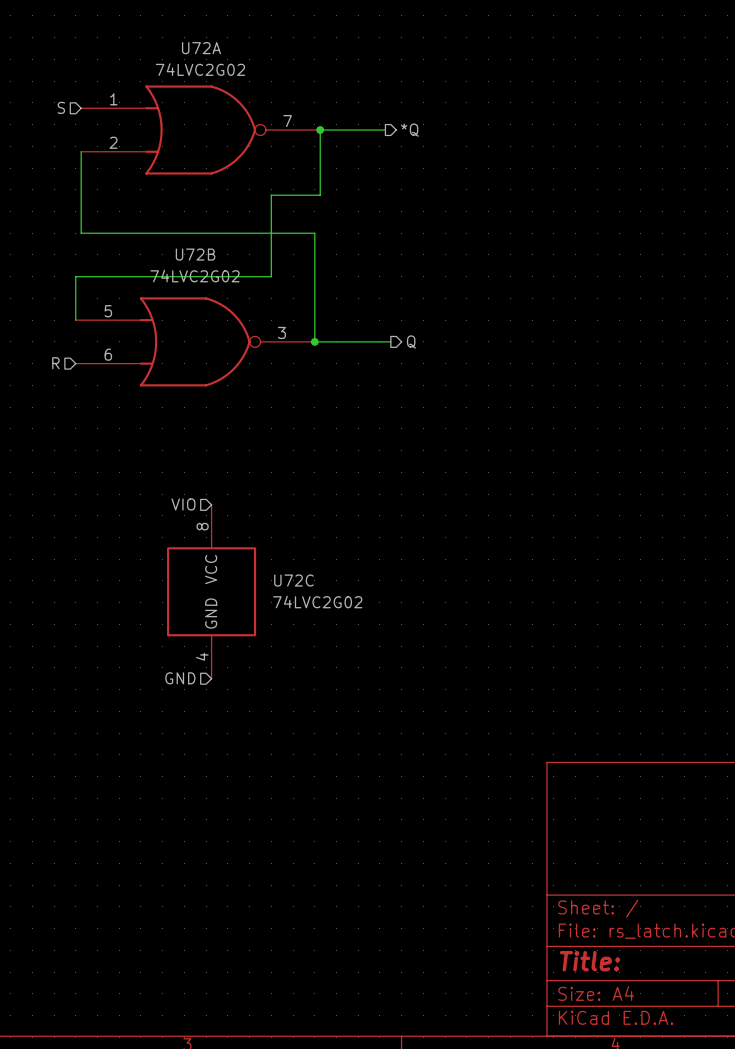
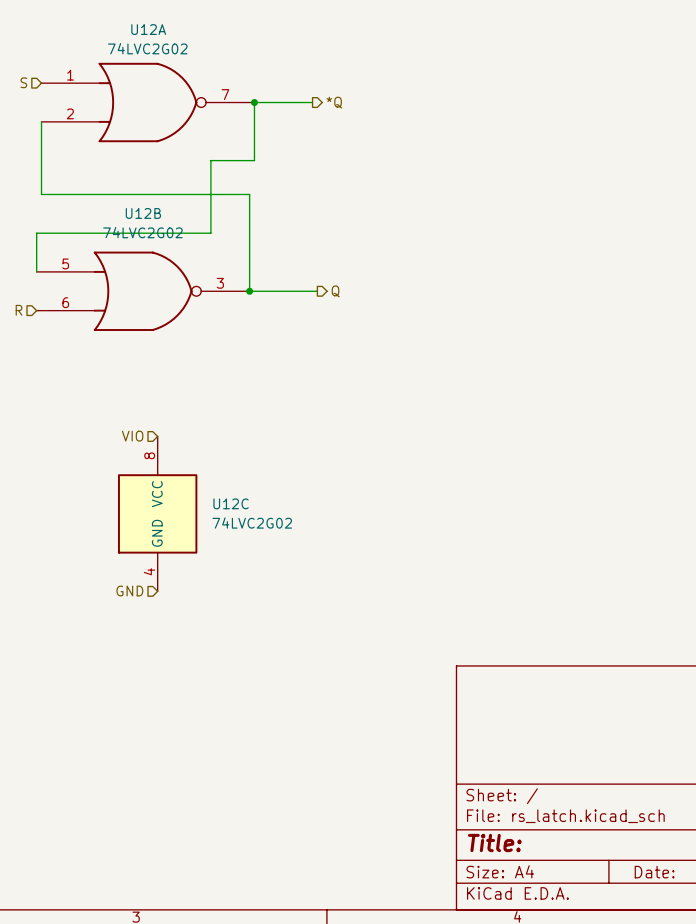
U72A name: U72A (201, 48) -> U12A (148, 29)
U72B name: U72B (195, 254) -> U12B (143, 213)
U72C name: U72C (293, 580) -> U12C (231, 503)

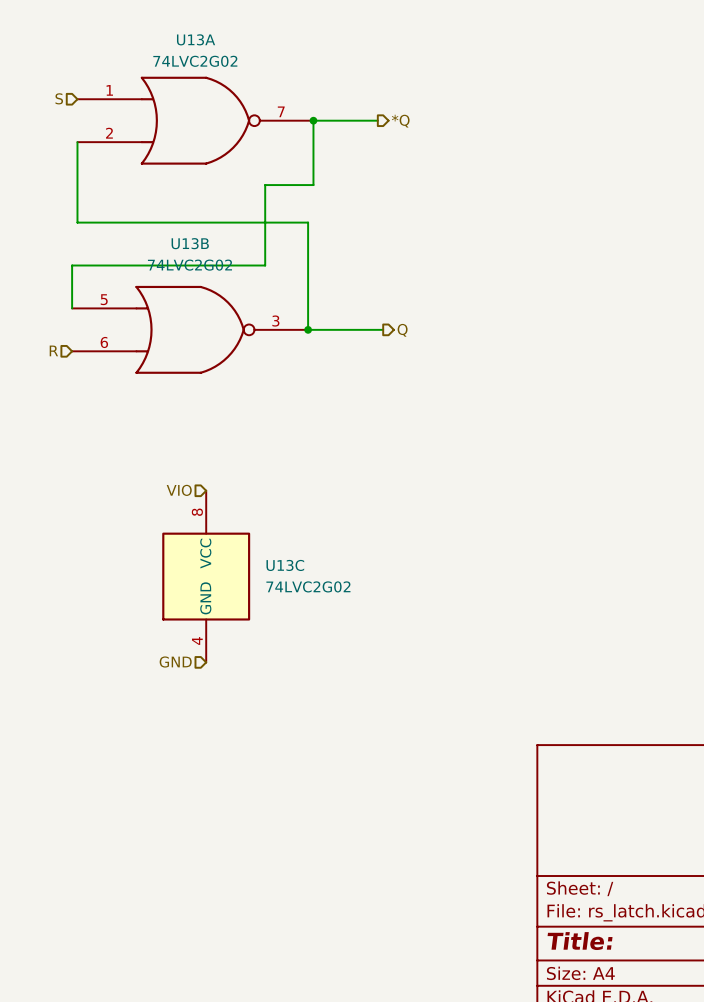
U12A name: U12A (148, 29) -> U13A (196, 39)
U12B name: U12B (143, 213) -> U13B (190, 243)
U12C name: U12C (231, 503) -> U13C (285, 565)

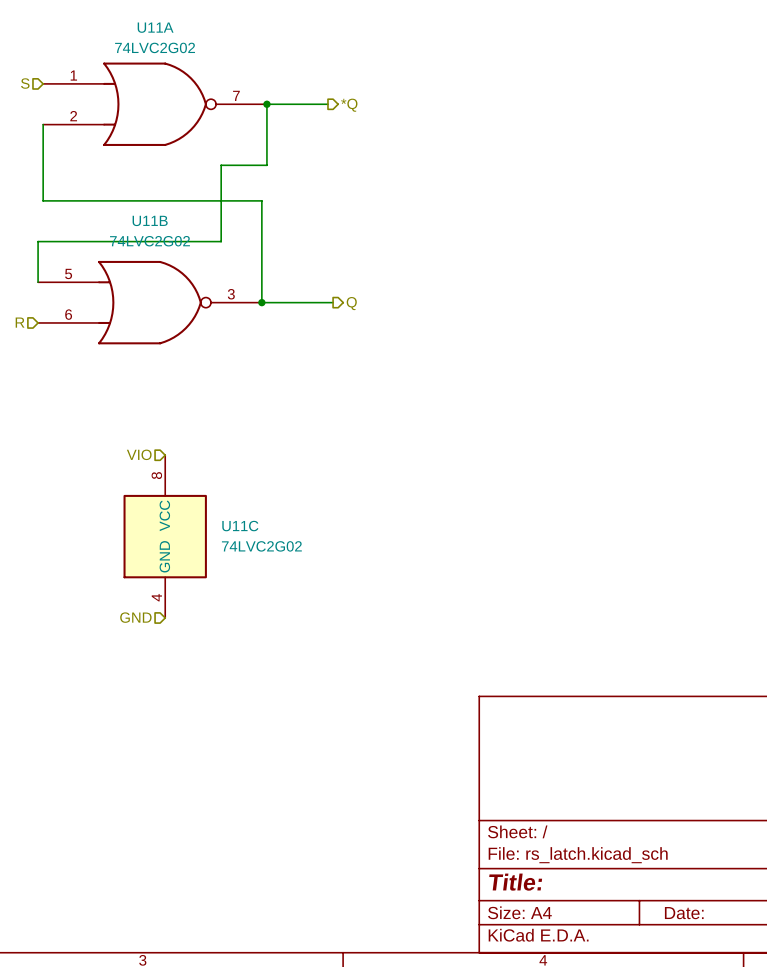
U13A name: U13A (196, 39) -> U11A (155, 27)
U13B name: U13B (190, 243) -> U11B (150, 220)
U13C name: U13C (285, 565) -> U11C (240, 526)

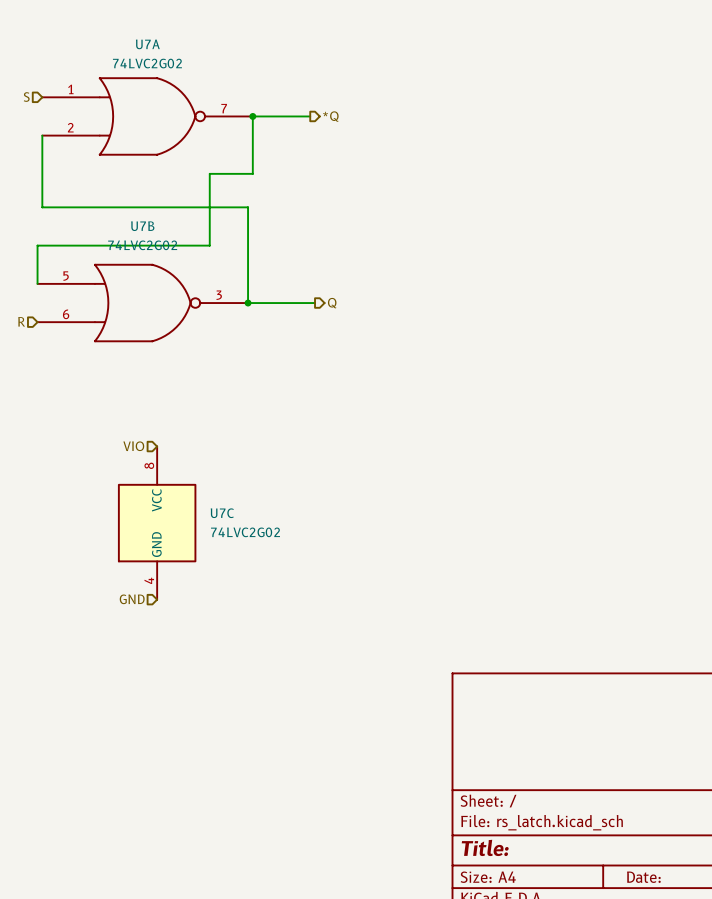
U11A name: U11A (155, 27) -> U7A (147, 44)
U11B name: U11B (150, 220) -> U7B (142, 226)
U11C name: U11C (240, 526) -> U7C (222, 513)

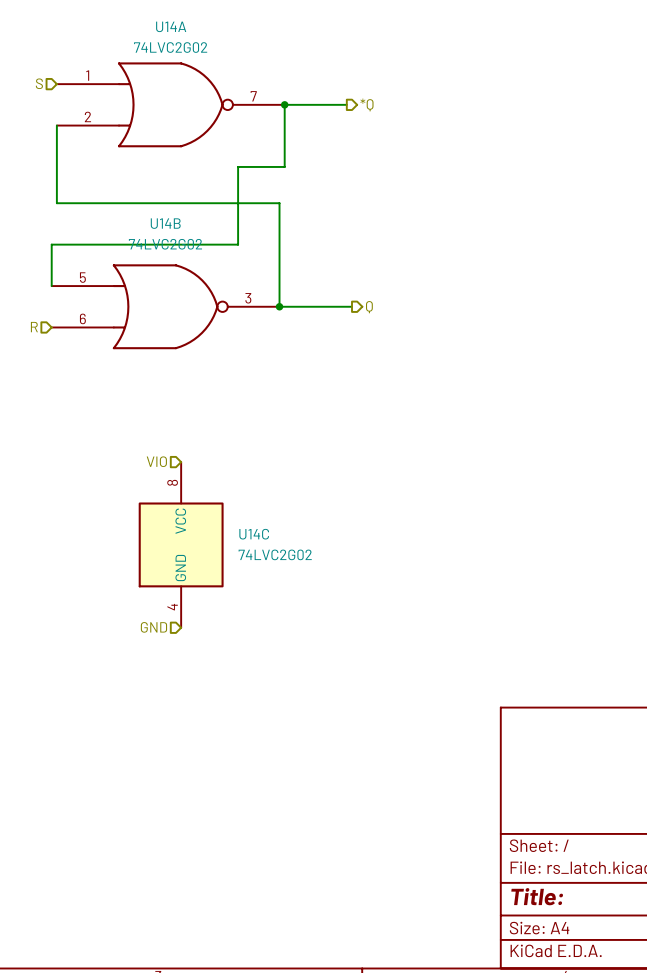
U7A name: U7A (147, 44) -> U14A (171, 26)
U7B name: U7B (142, 226) -> U14B (165, 223)
U7C name: U7C (222, 513) -> U14C (254, 534)

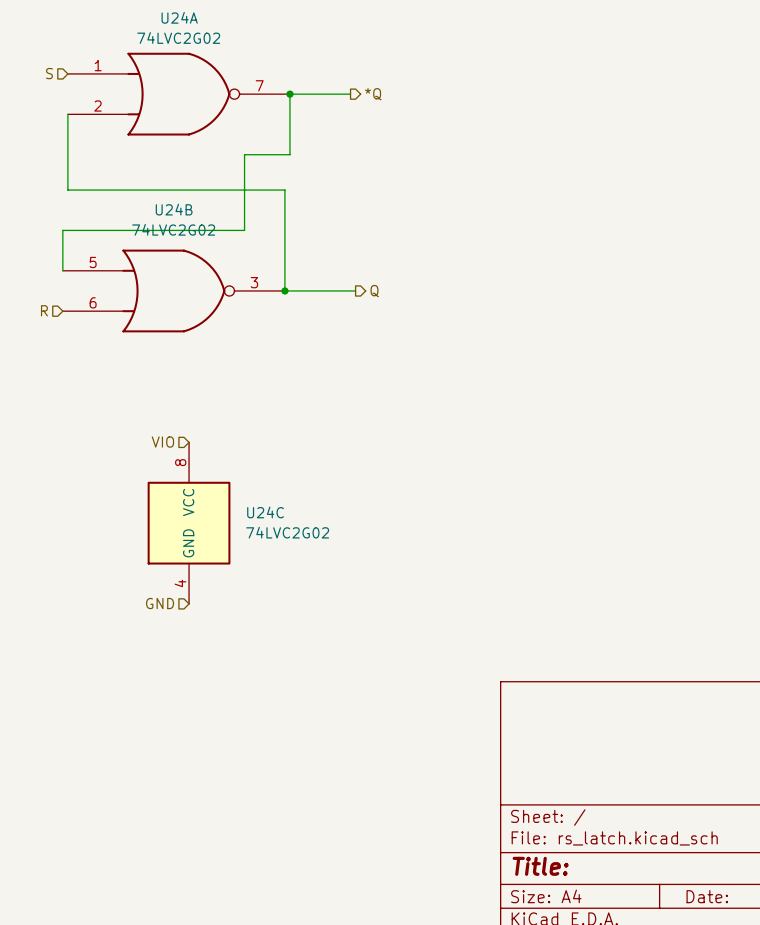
U14A name: U14A (171, 26) -> U24A (179, 17)
U14B name: U14B (165, 223) -> U24B (174, 209)
U14C name: U14C (254, 534) -> U24C (265, 512)

